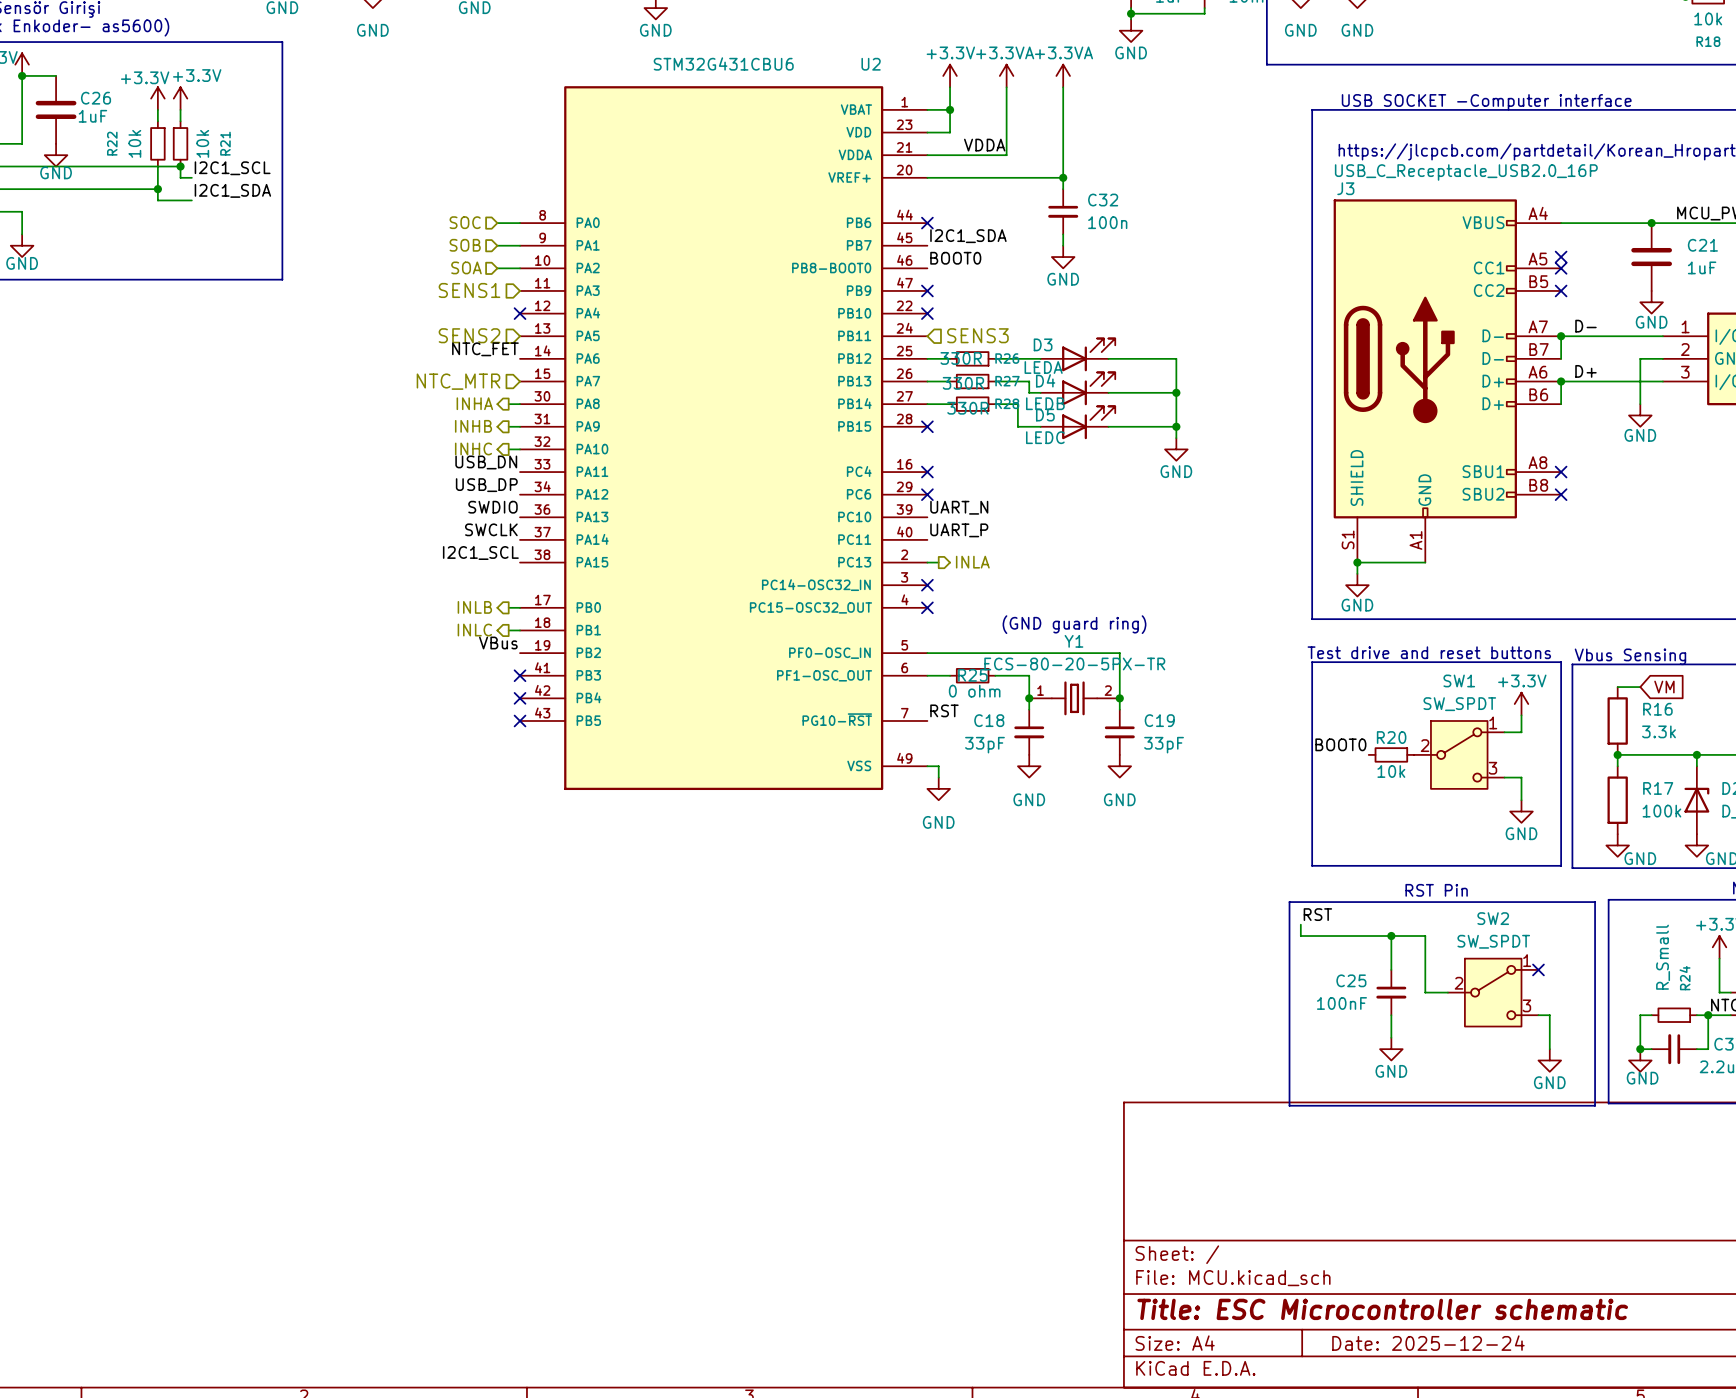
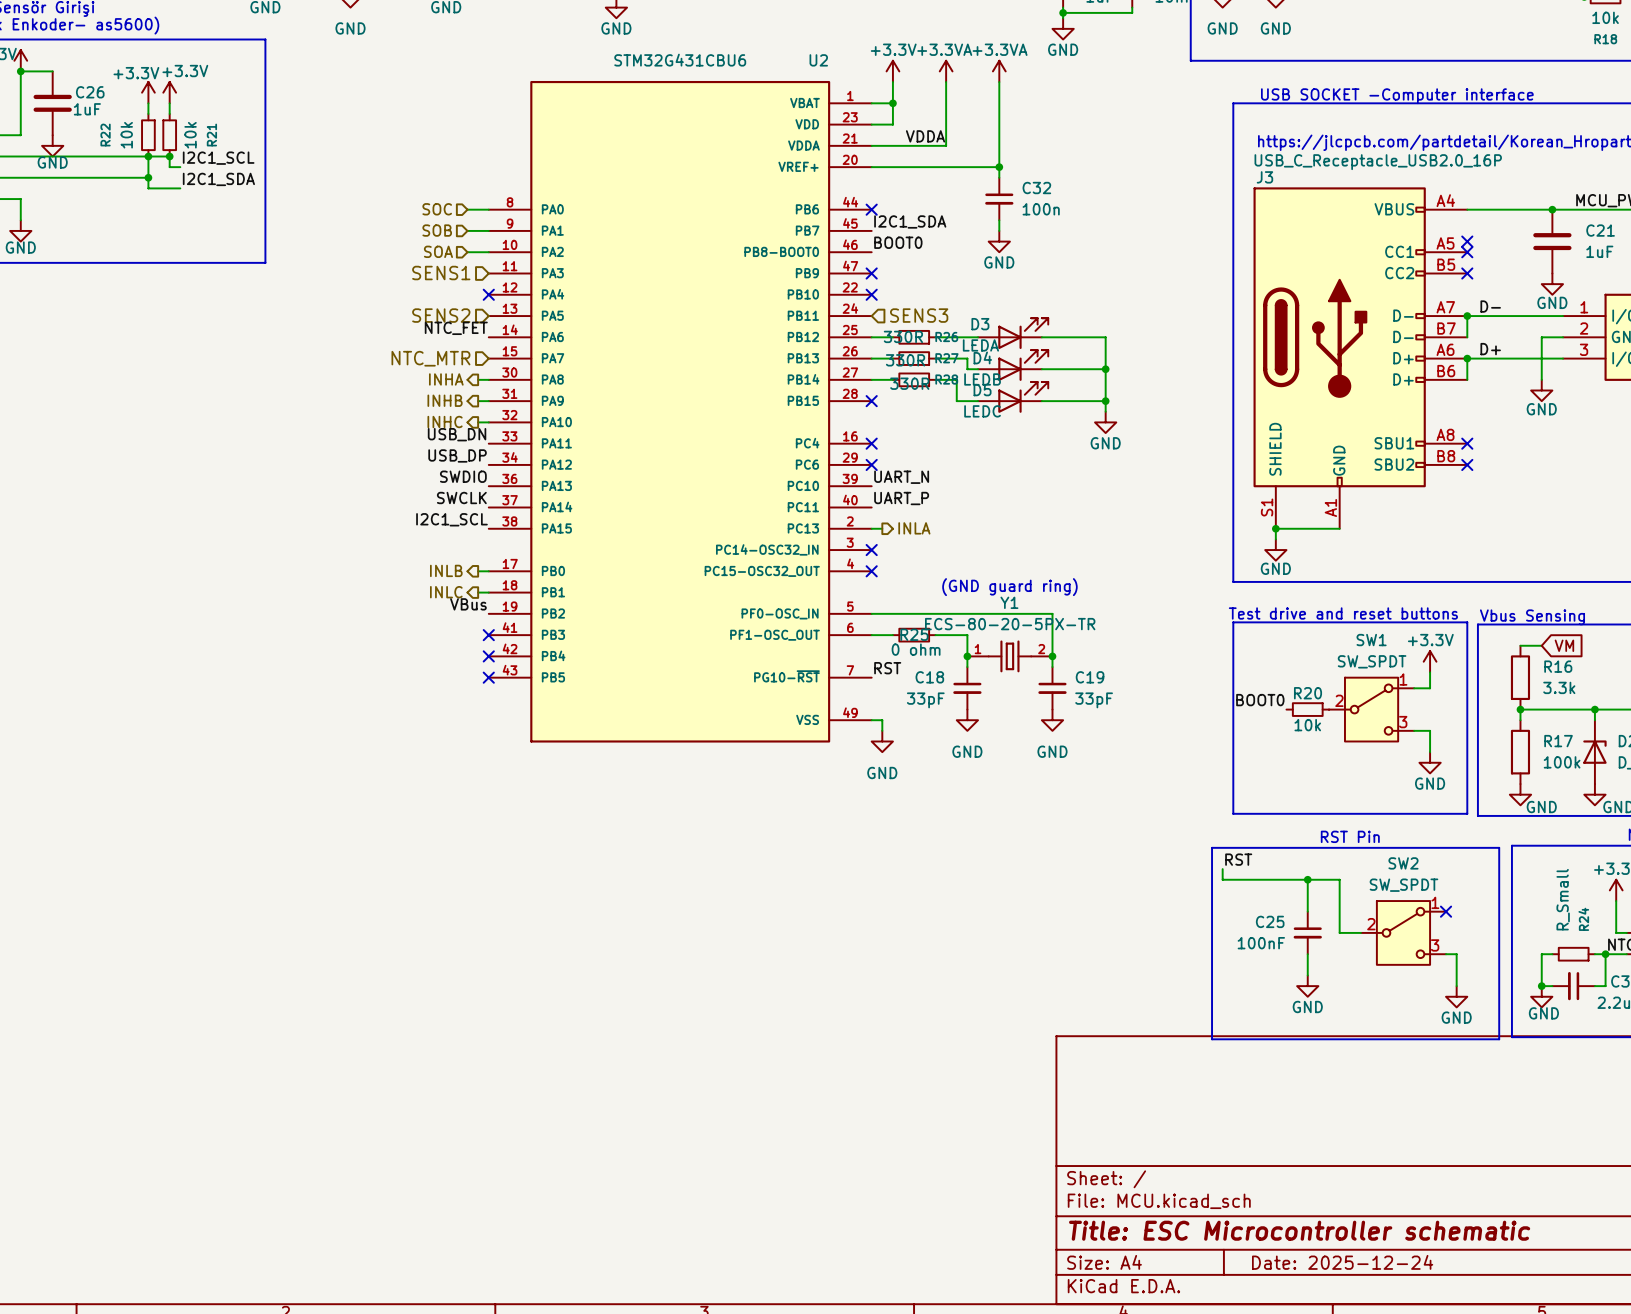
junction: none -> (148, 156)

